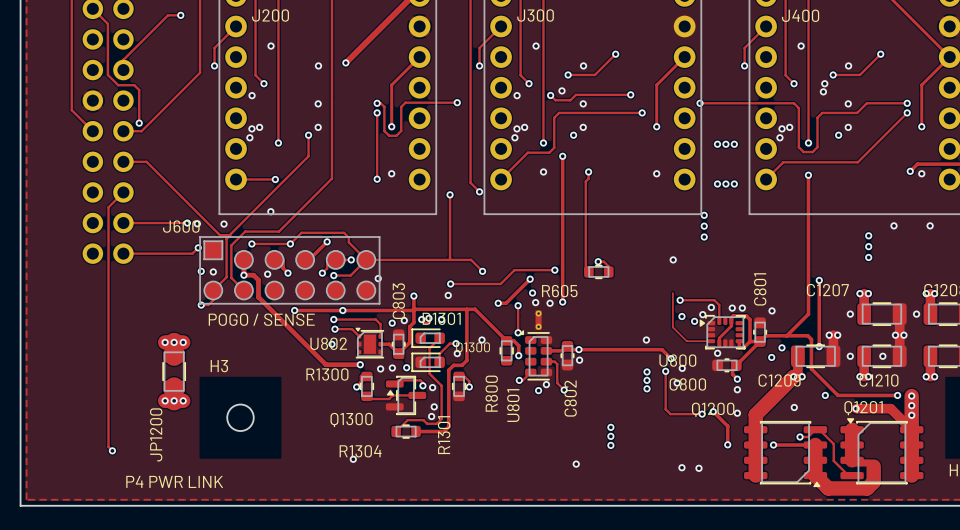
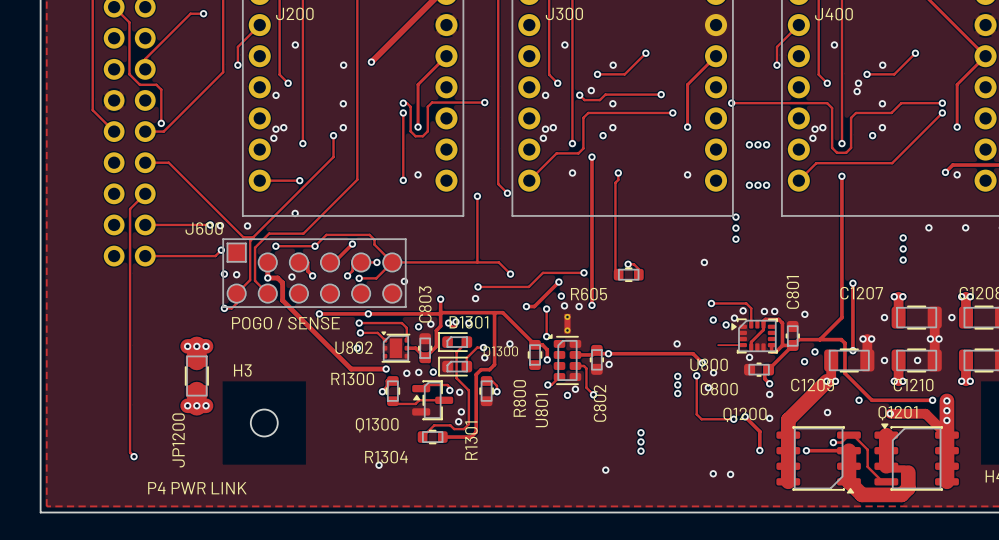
track: (501, 26) (479, 47) (479, 65) -> none
via: (479, 65) -> none
track: (672, 293) (672, 327) (686, 341) -> none

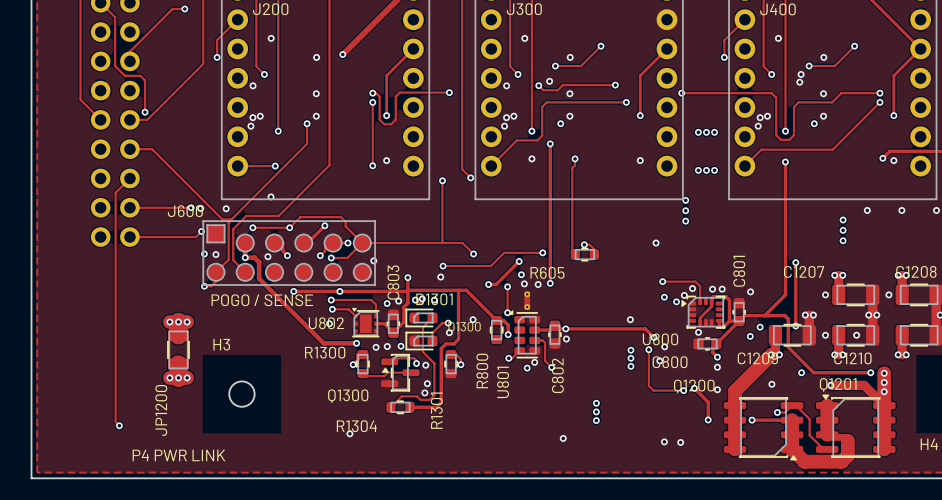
track: (718, 345) (743, 345) -> none

